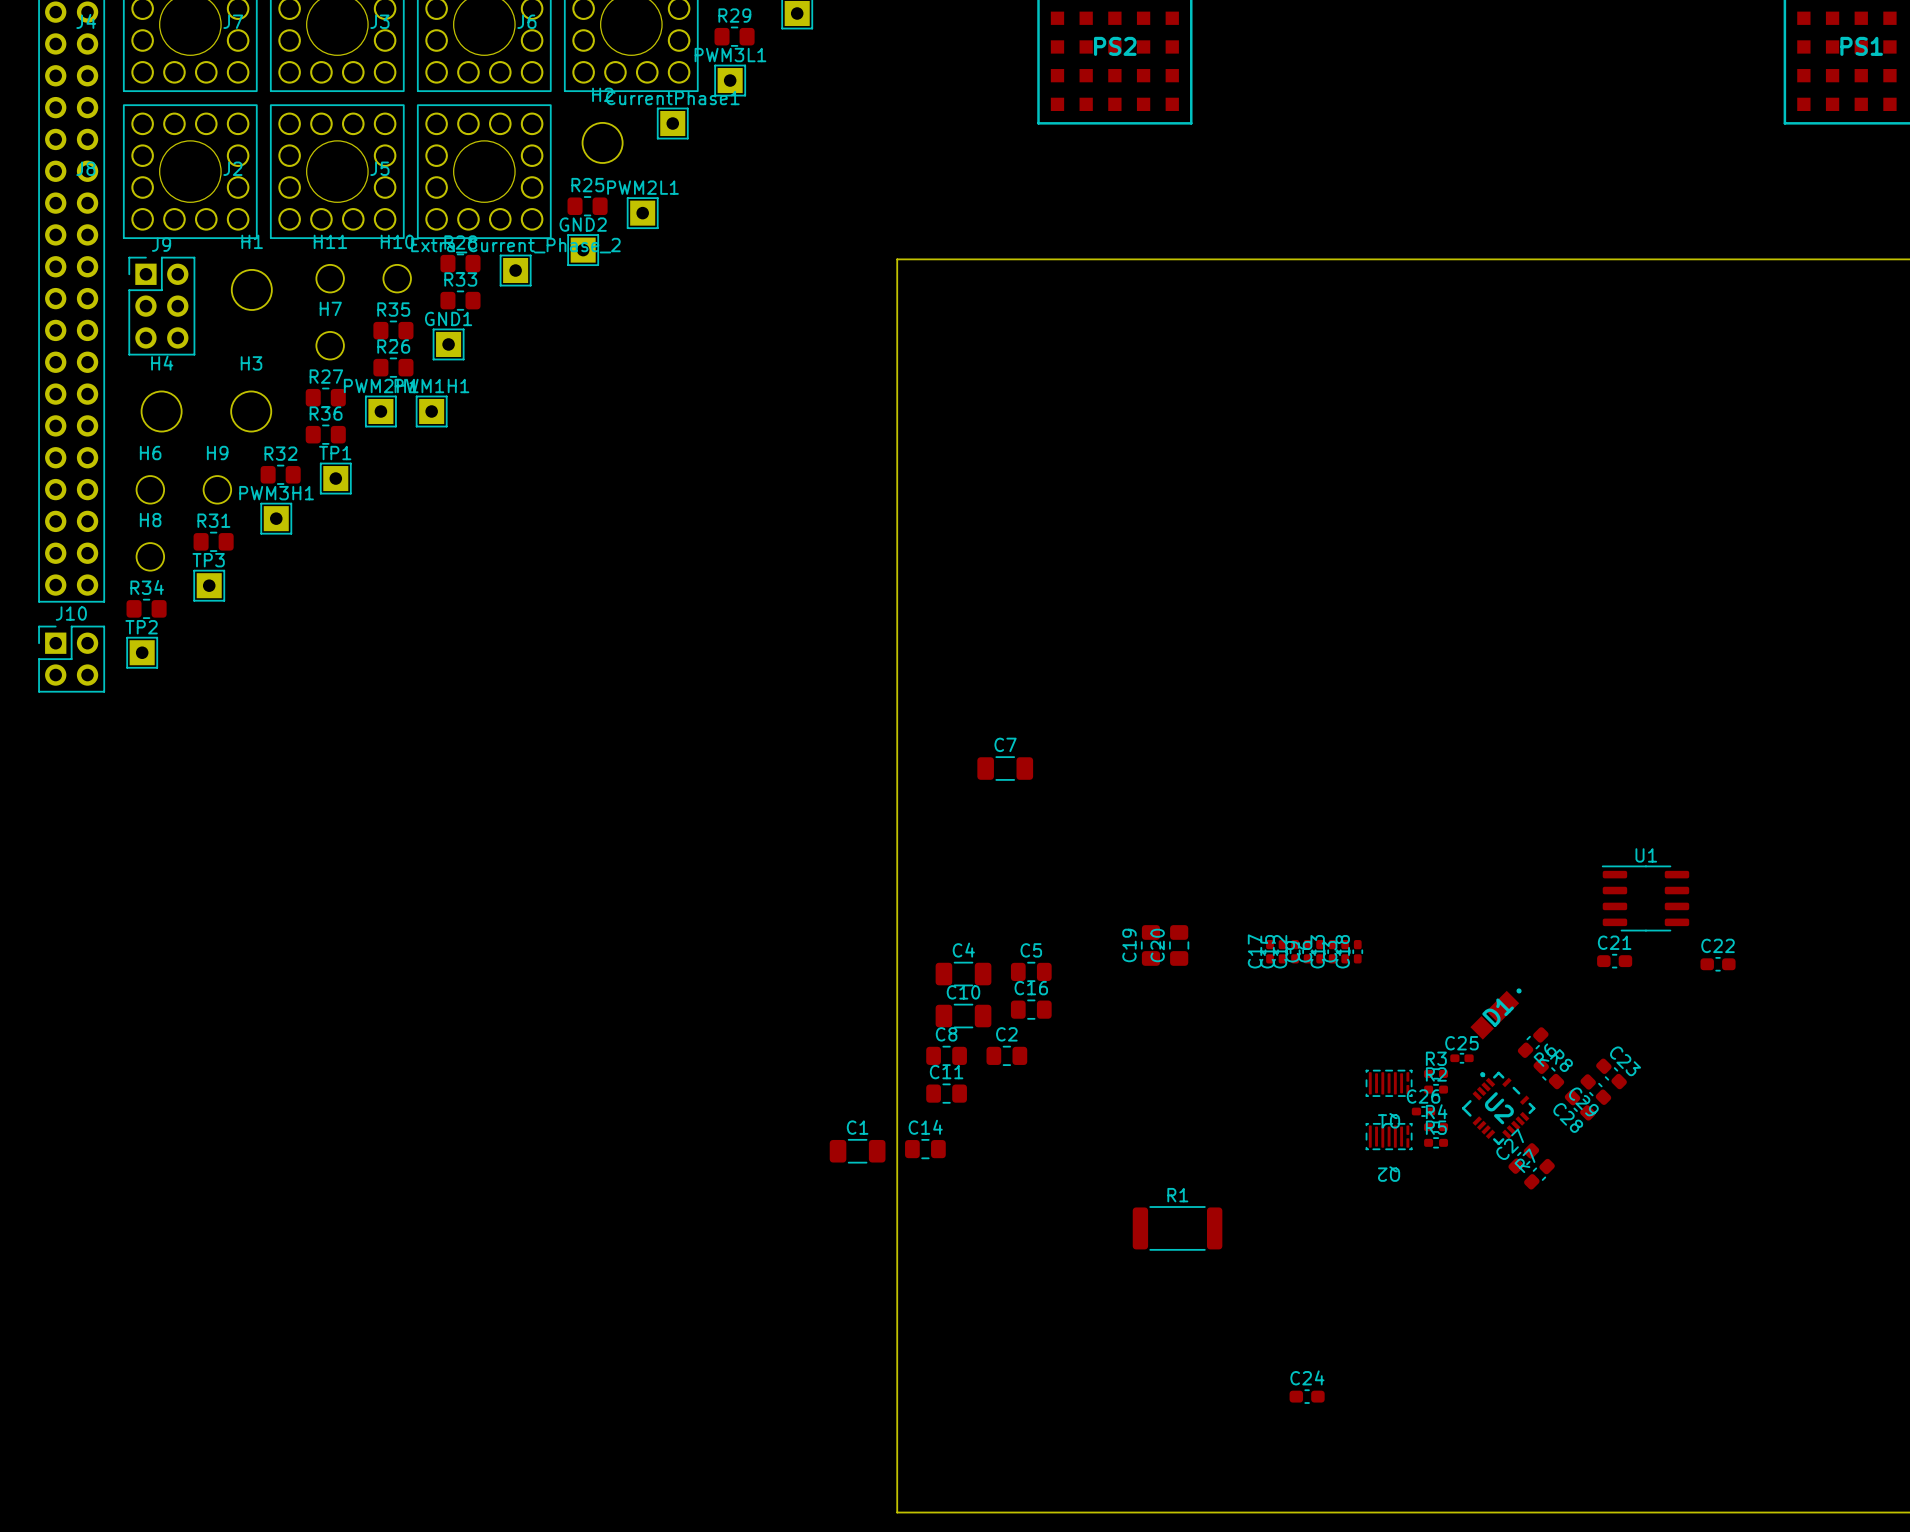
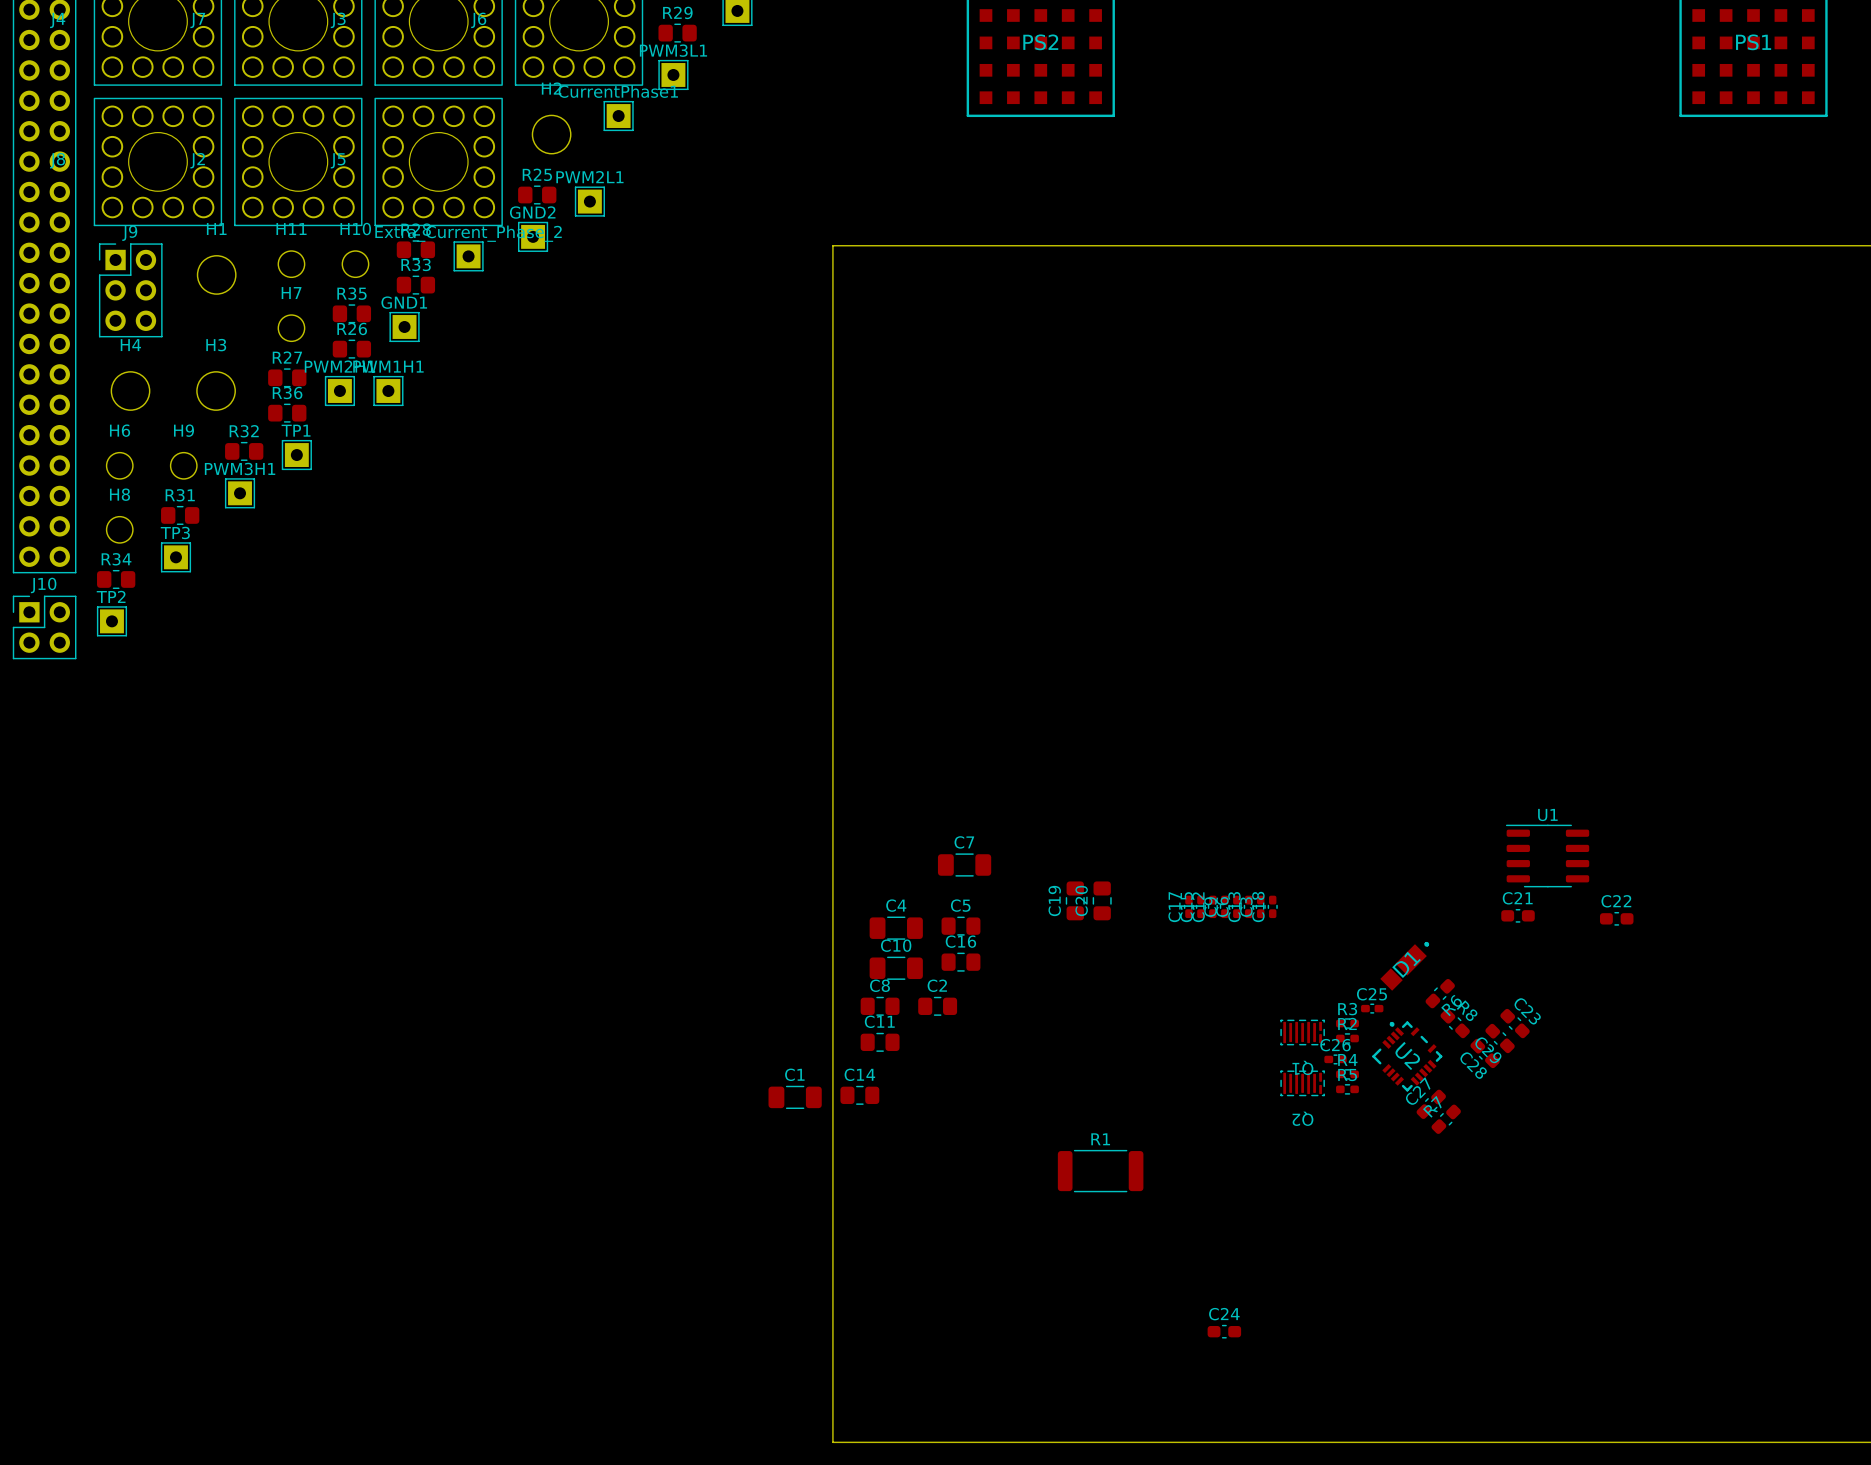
C7 position: (1005, 768) -> (964, 864)

